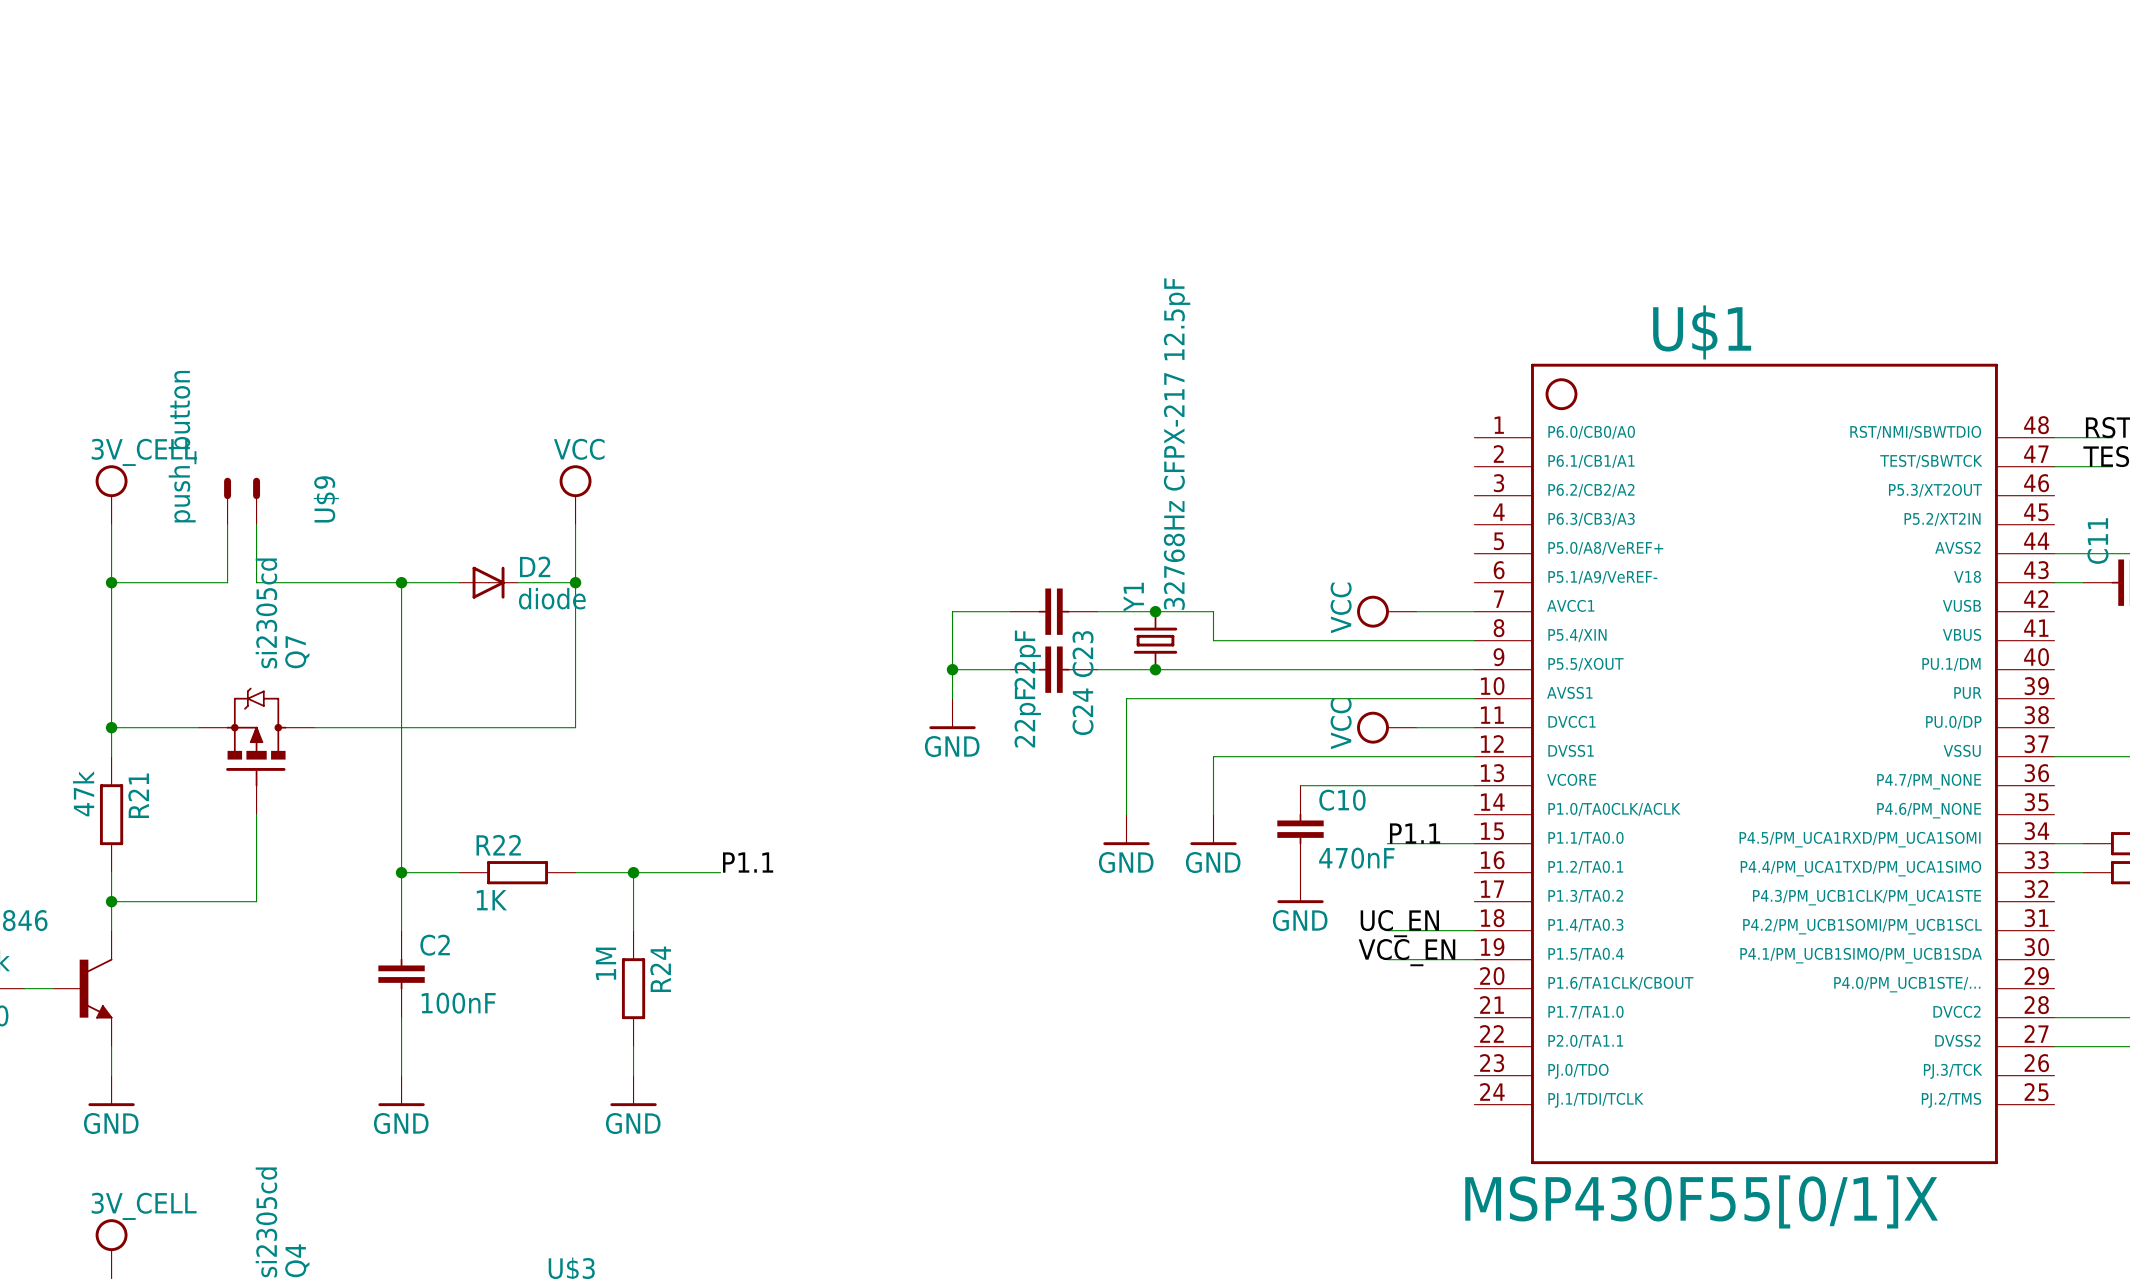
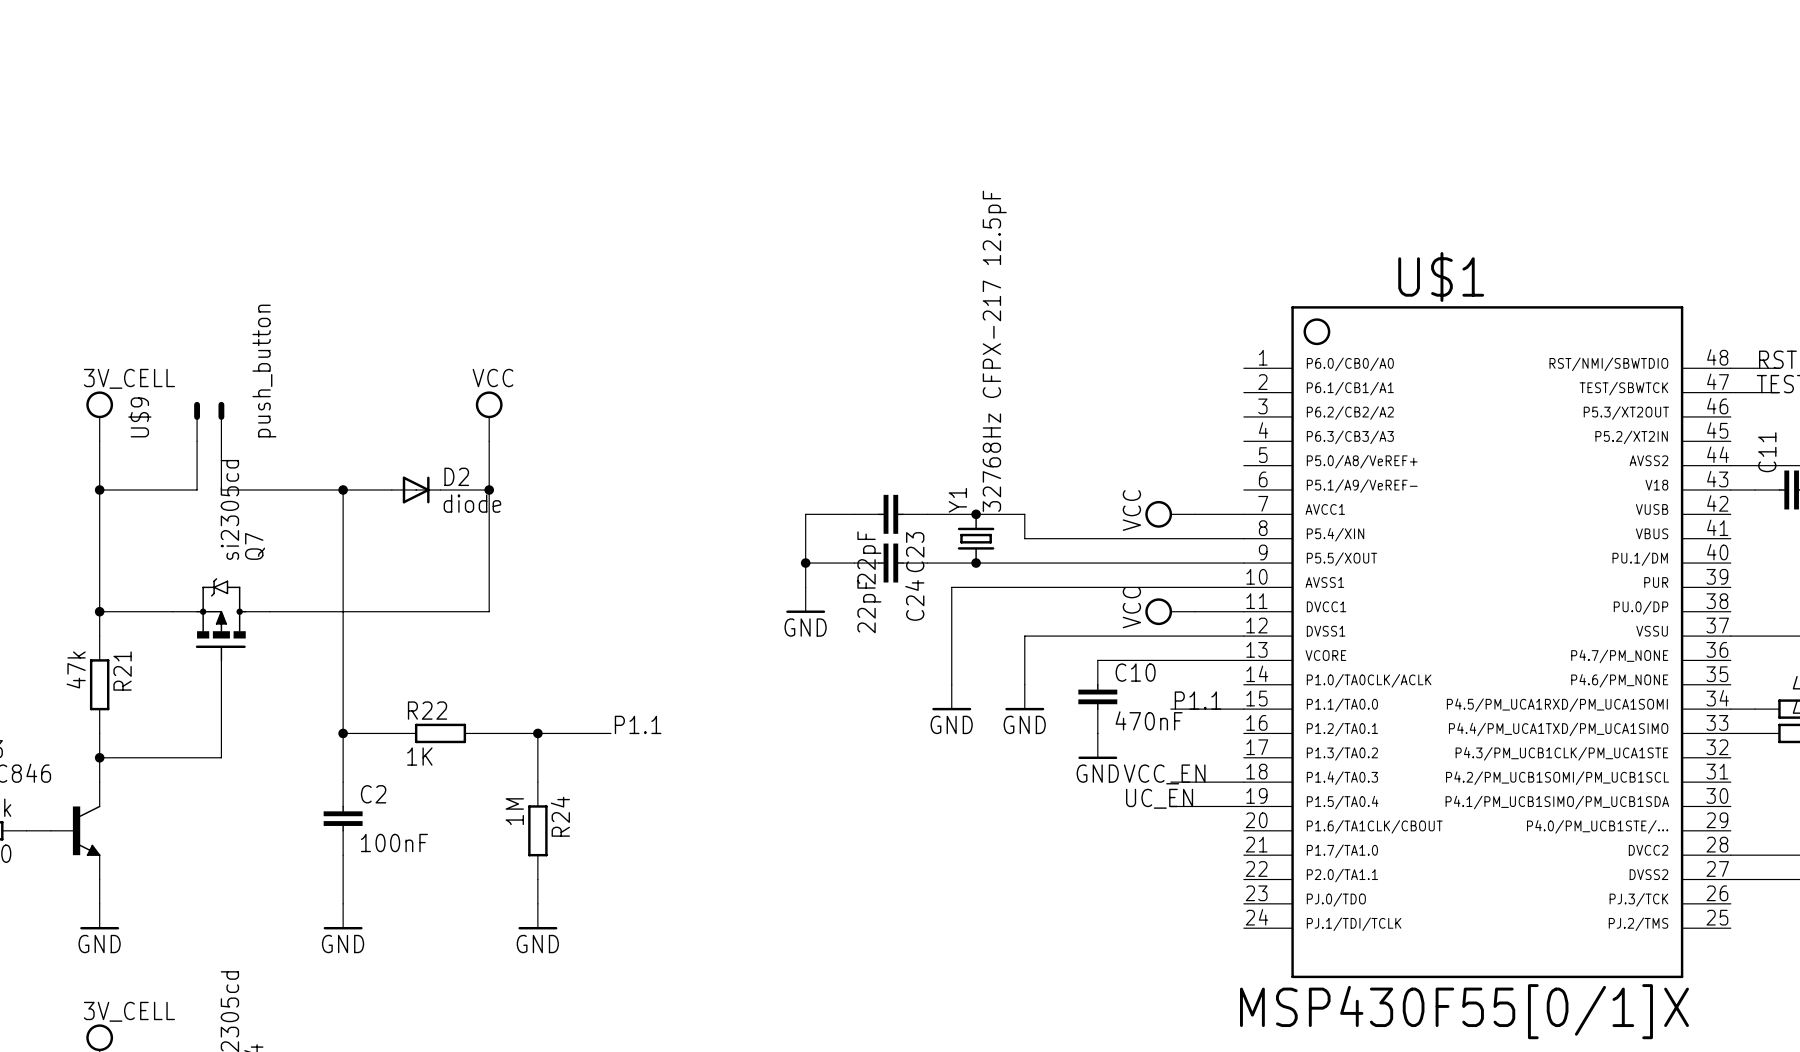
U$9 value position: push_button (182, 446) -> push_button (264, 371)
U$9 name position: U$9 (326, 499) -> U$9 (139, 417)
label position: UC_EN (1399, 923) -> UC_EN (1159, 798)
label position: VCC_EN (1406, 952) -> VCC_EN (1164, 774)

